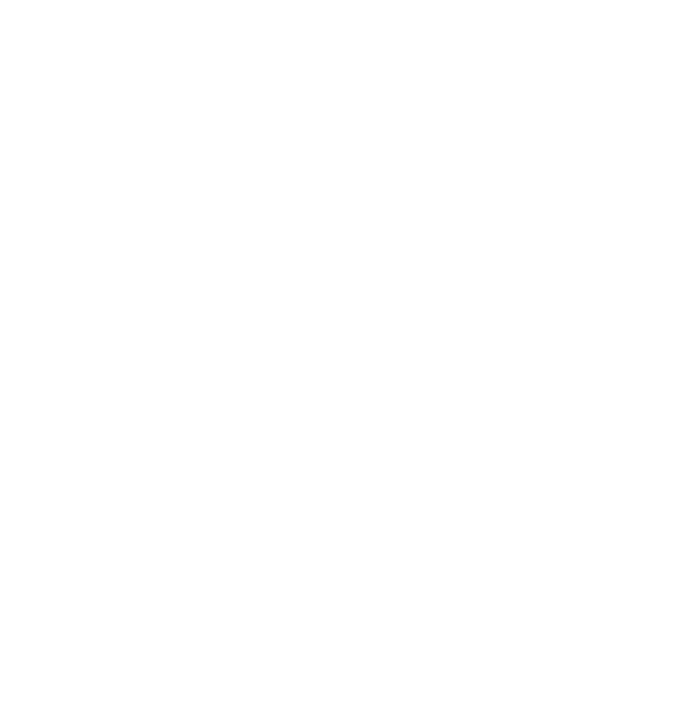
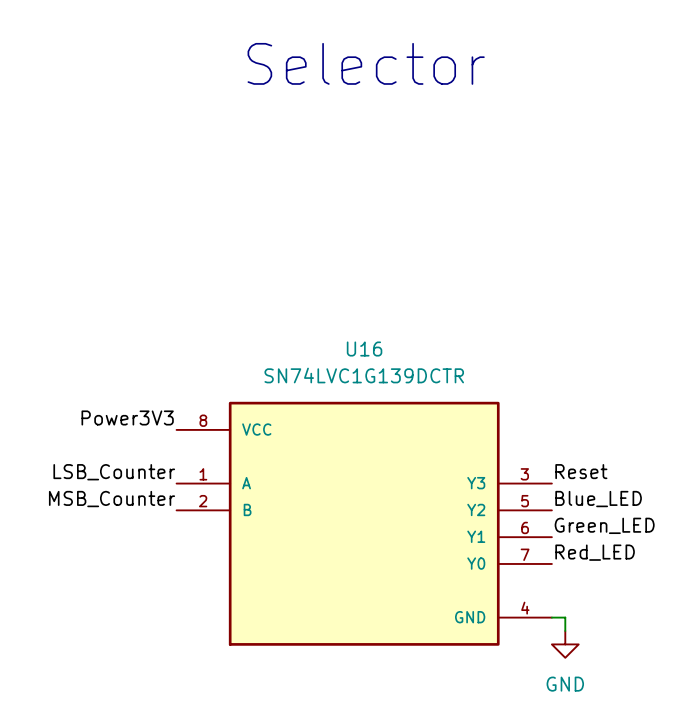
text: none -> Selector (366, 63)
label: none -> Power3V3 (127, 417)
label: none -> Reset (581, 471)
label: none -> LSB_Counter (114, 472)
label: none -> MSB_Counter (112, 499)
label: none -> Blue_LED (598, 499)
U16: none -> SN74LVC1G139DCTR (364, 523)
label: none -> Green_LED (604, 525)
label: none -> Red_LED (595, 552)
wire: none -> (551, 617) (565, 617) (565, 631)
power symbol: none -> GND (565, 644)

